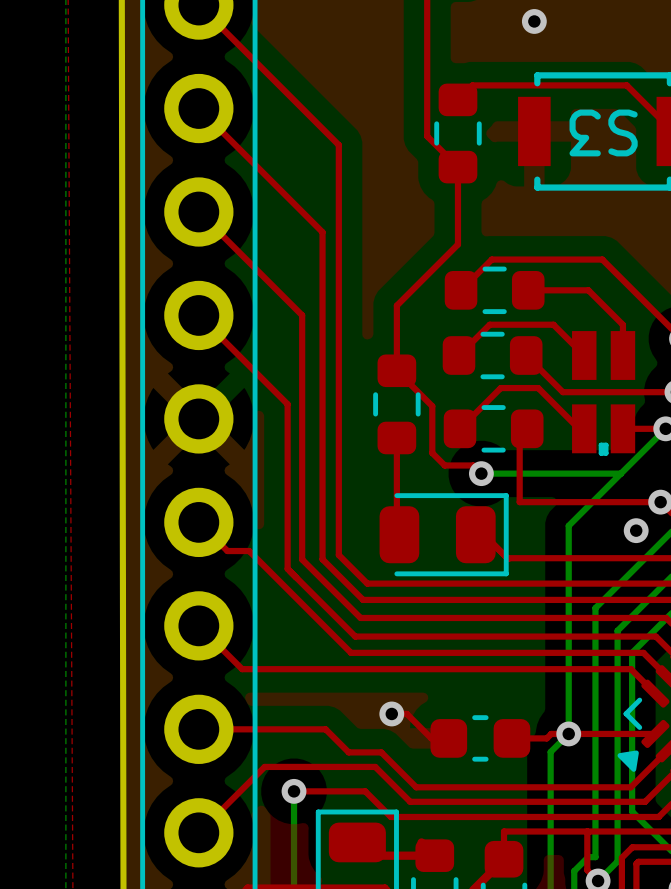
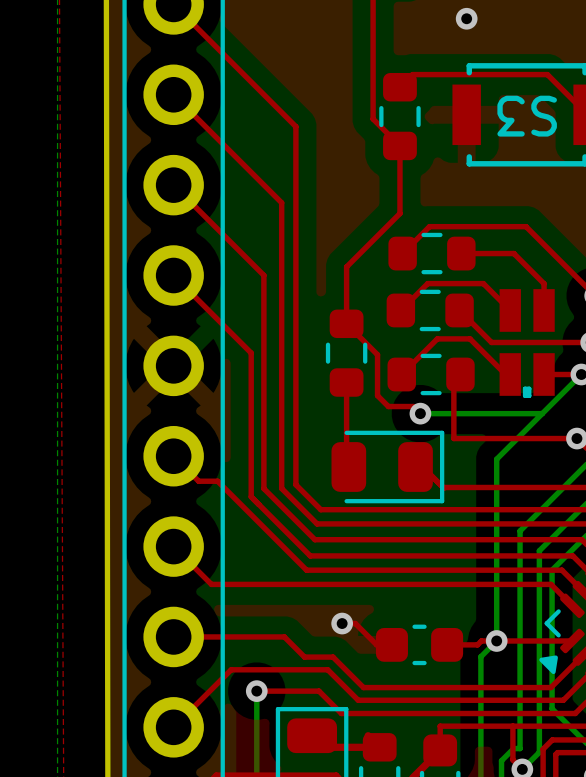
via: (636, 530) -> none

